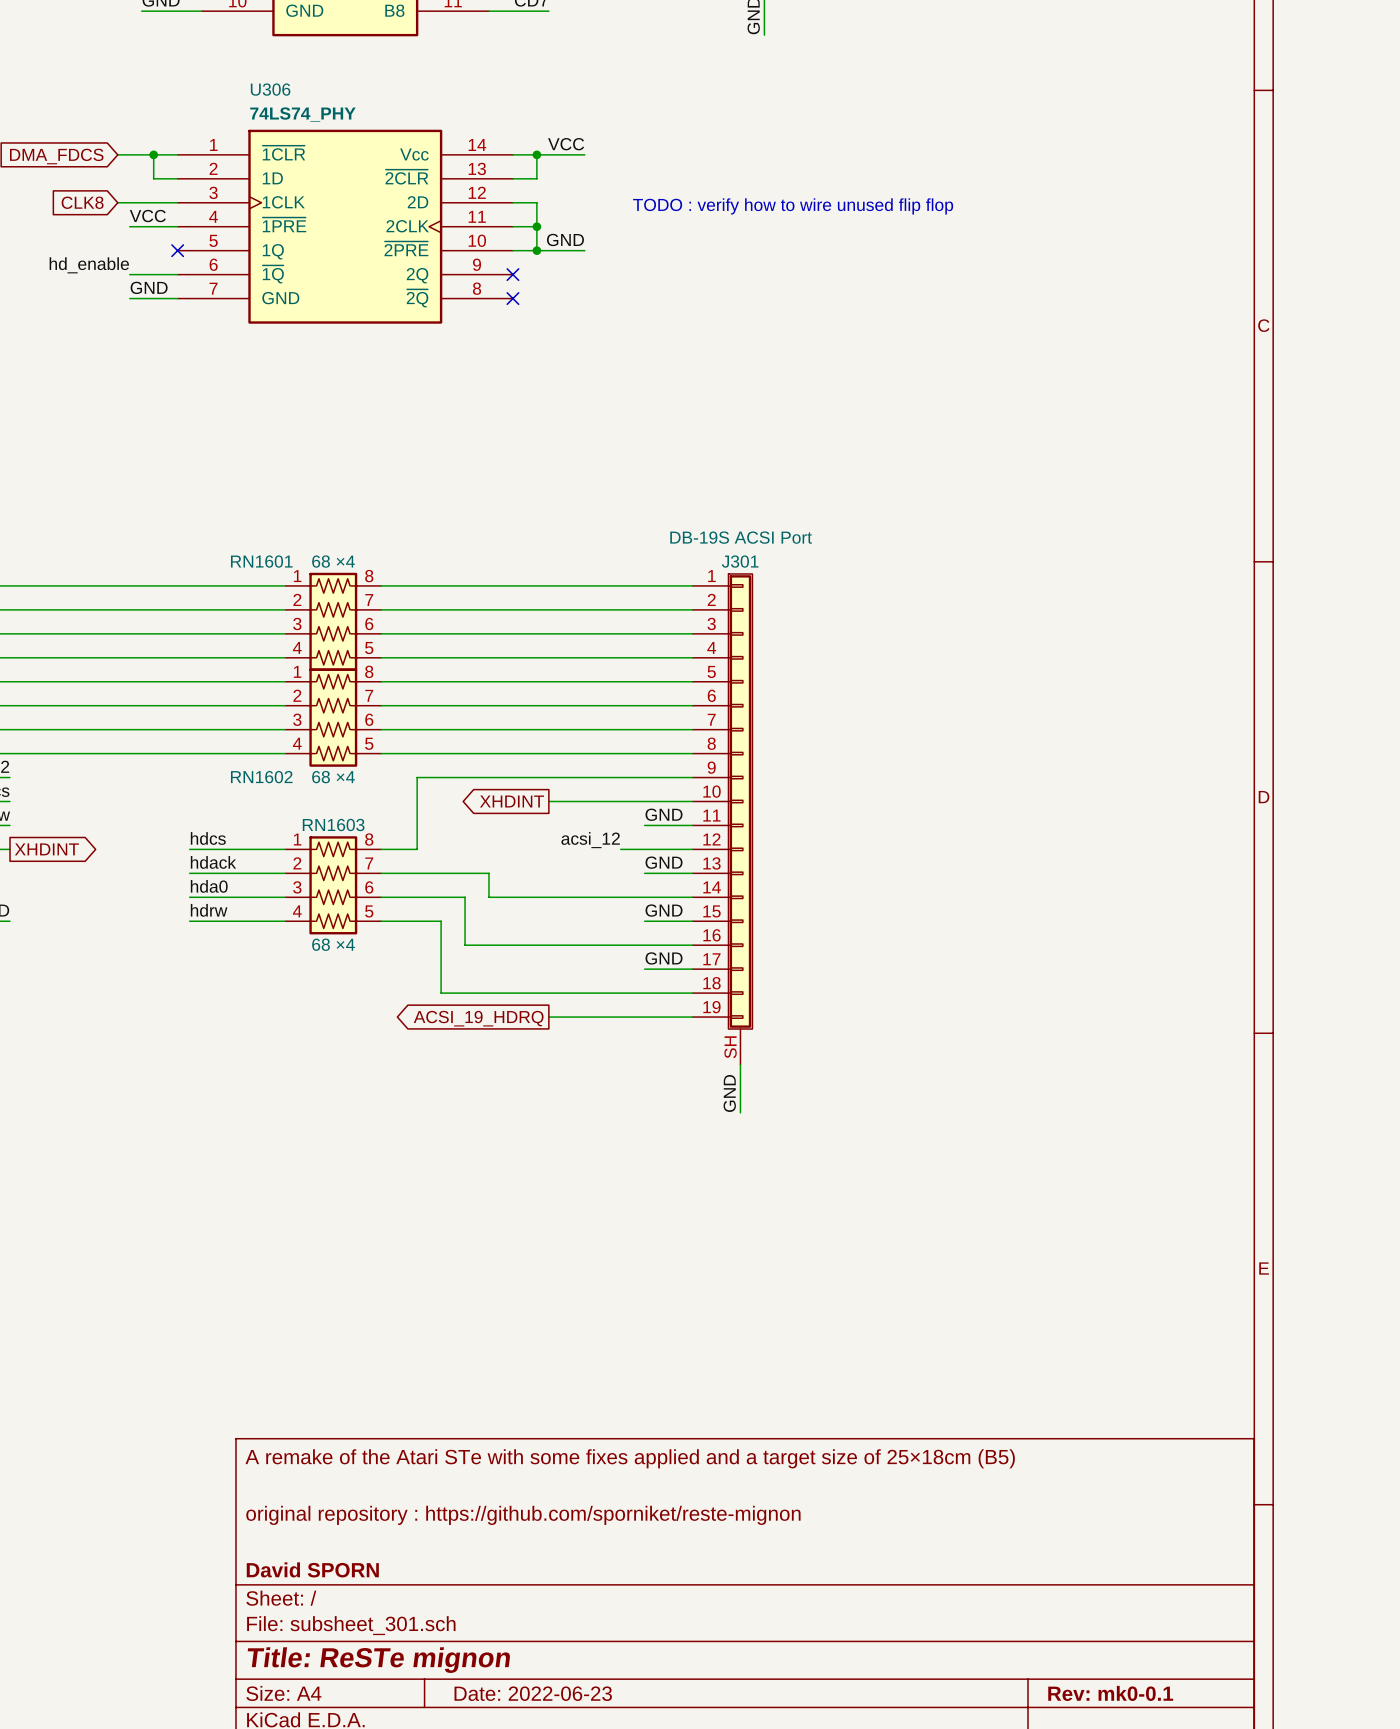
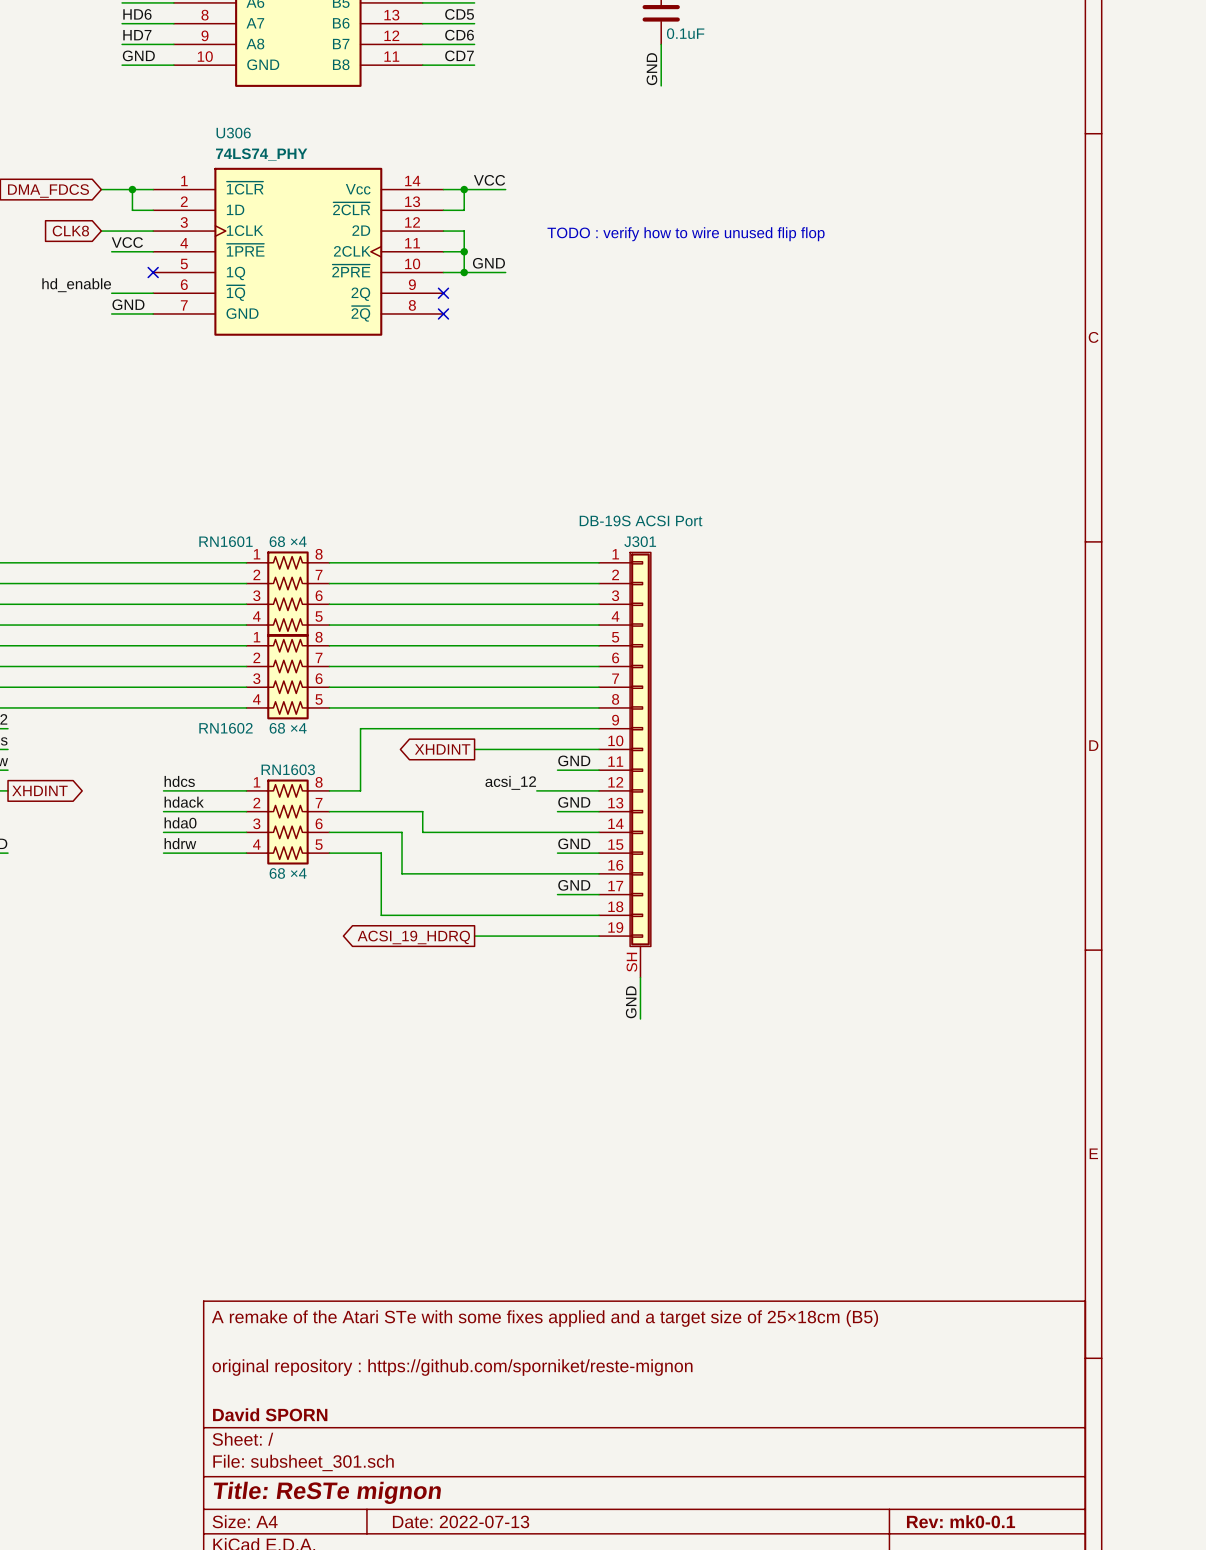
title block: Date: 2022-06-23 (533, 1693) -> Date: 2022-07-13 (461, 1521)

